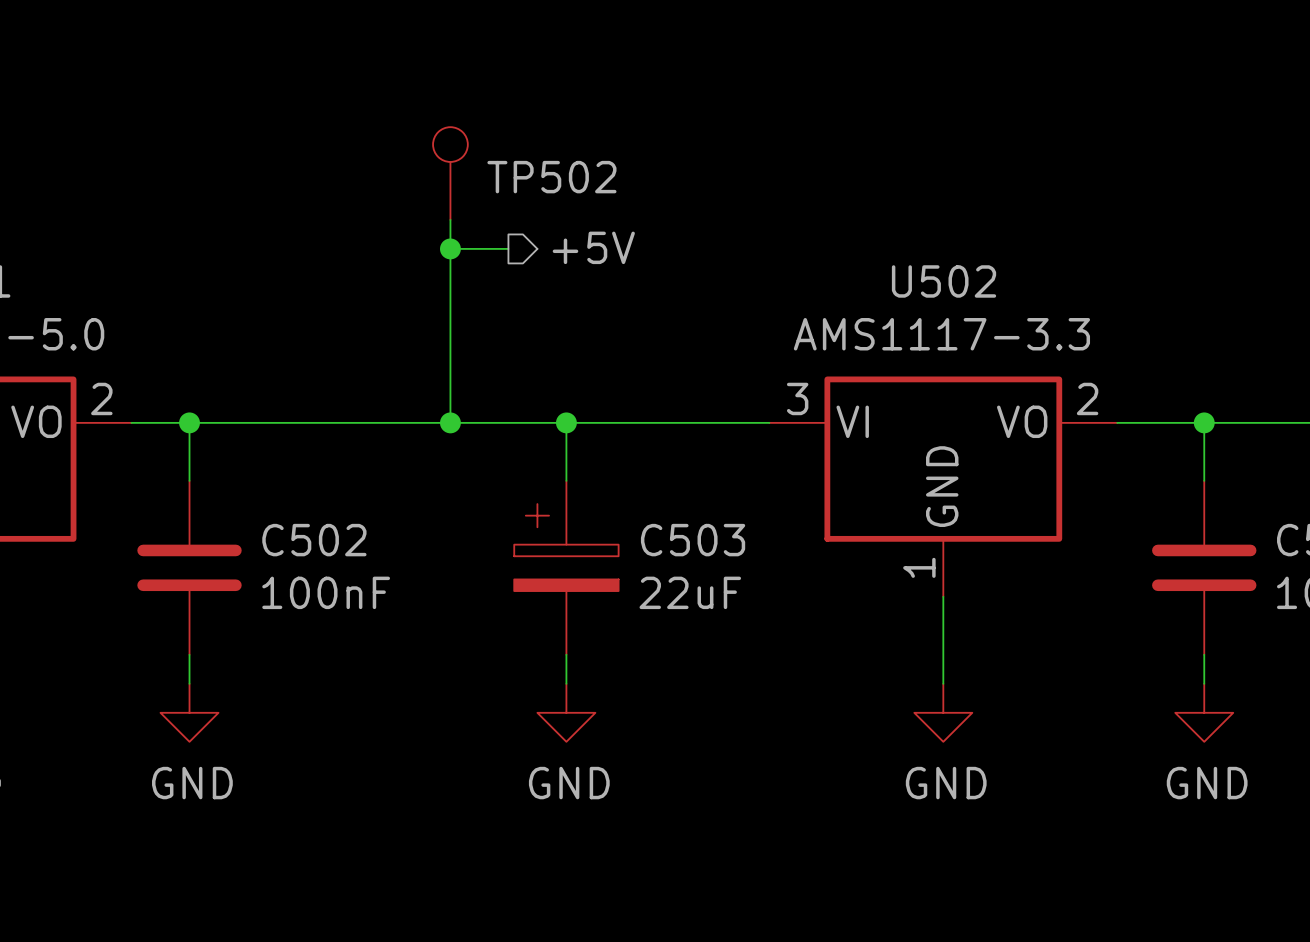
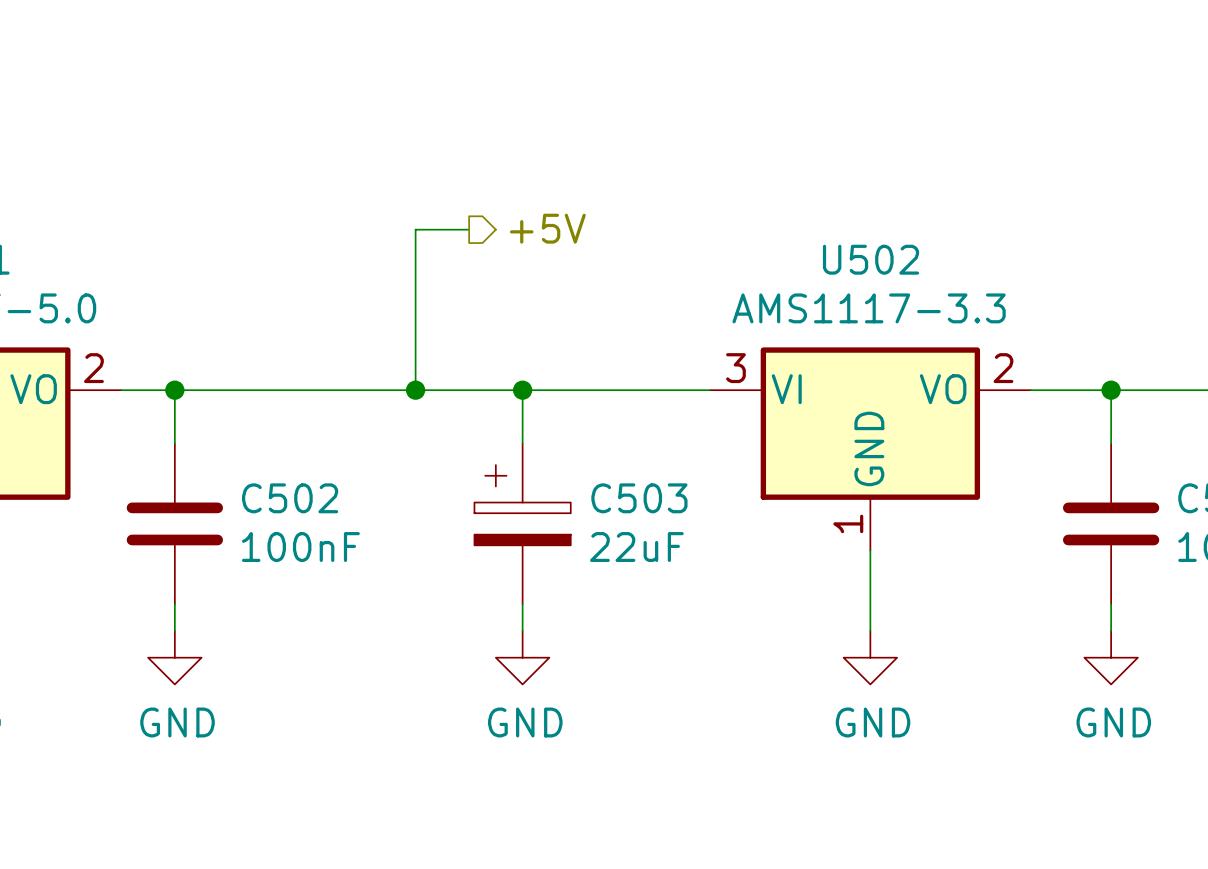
TP502: (450, 173) -> none
wire: (450, 219) (450, 248) -> none
junction: (450, 248) -> none

